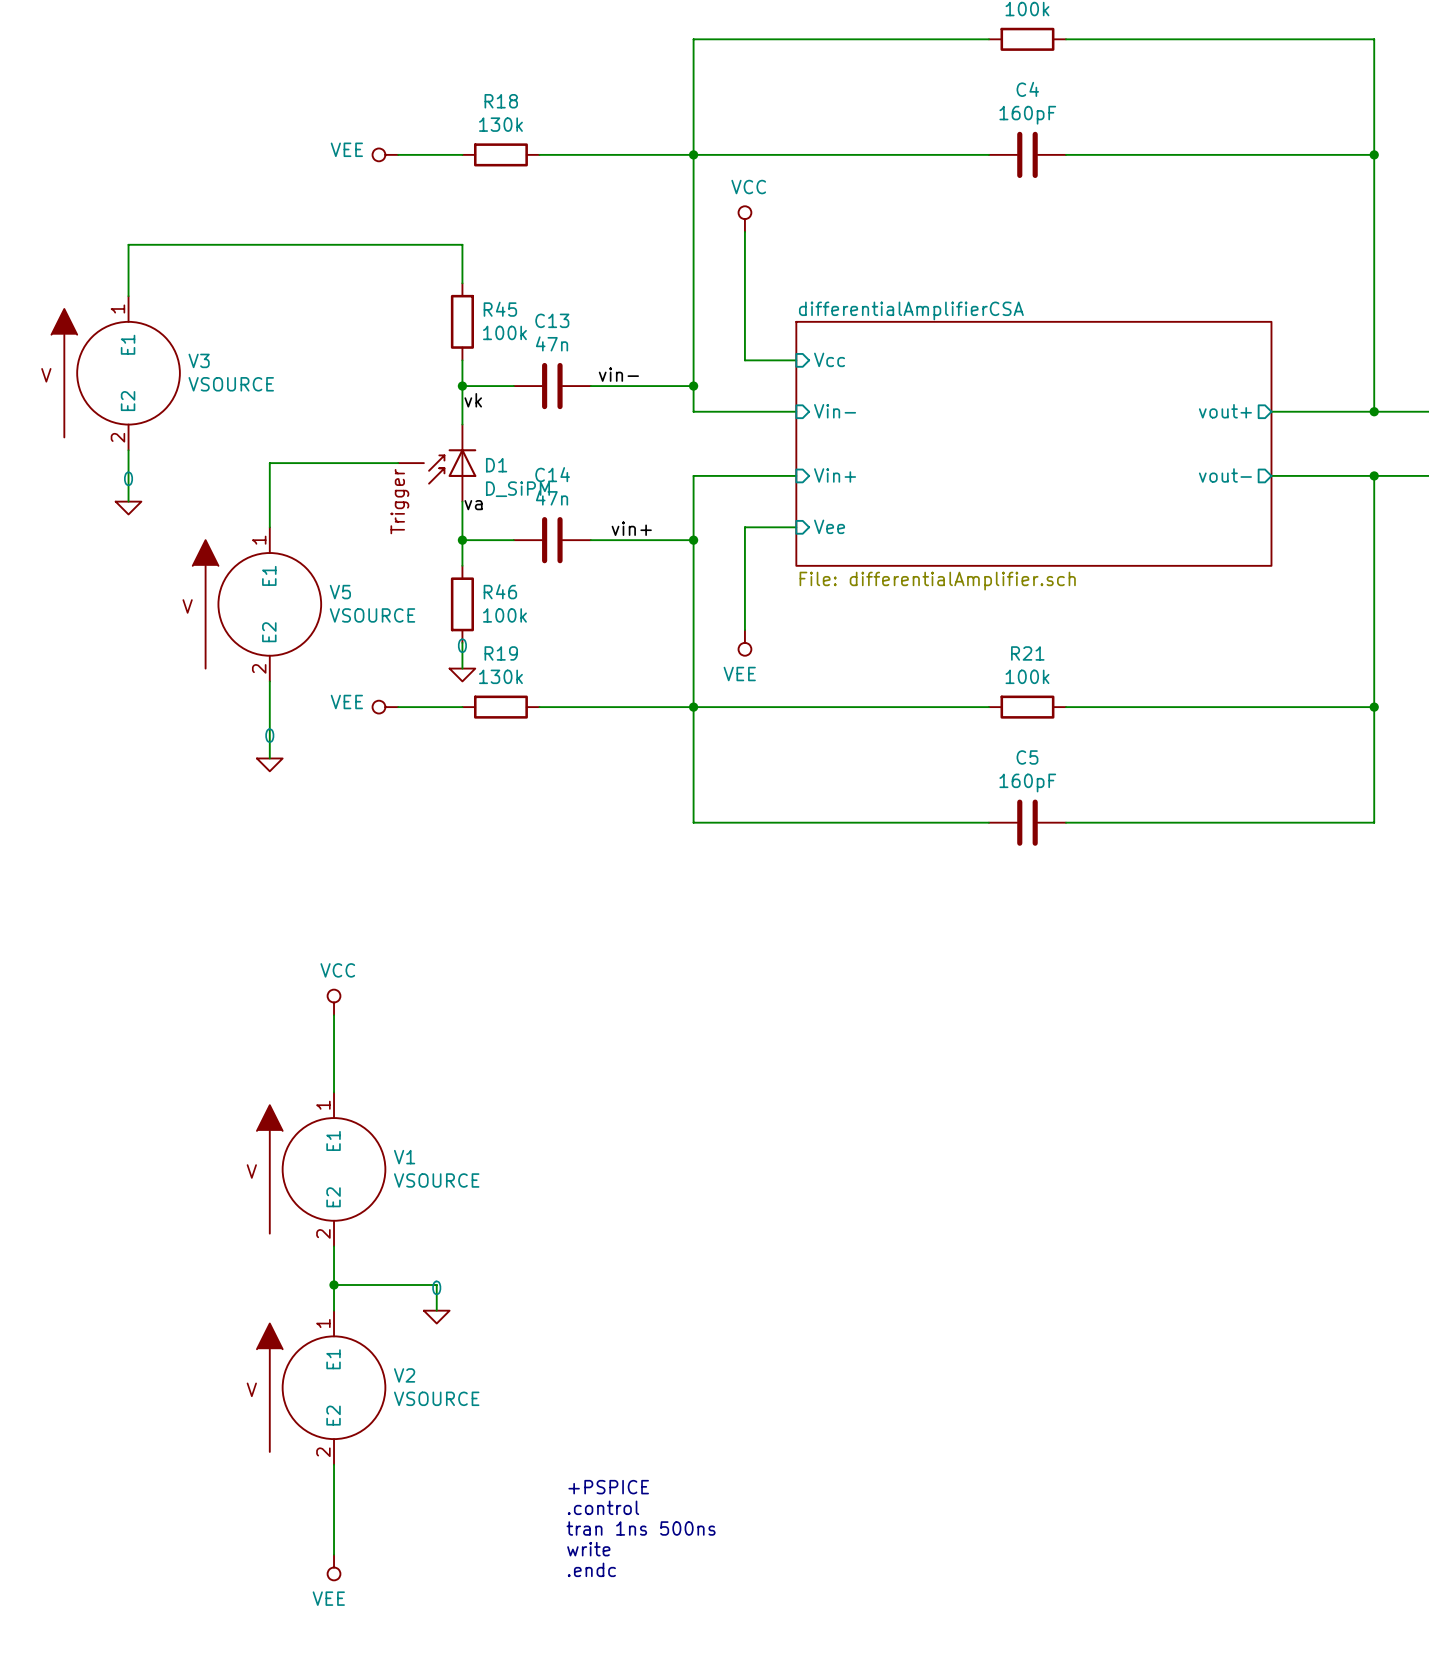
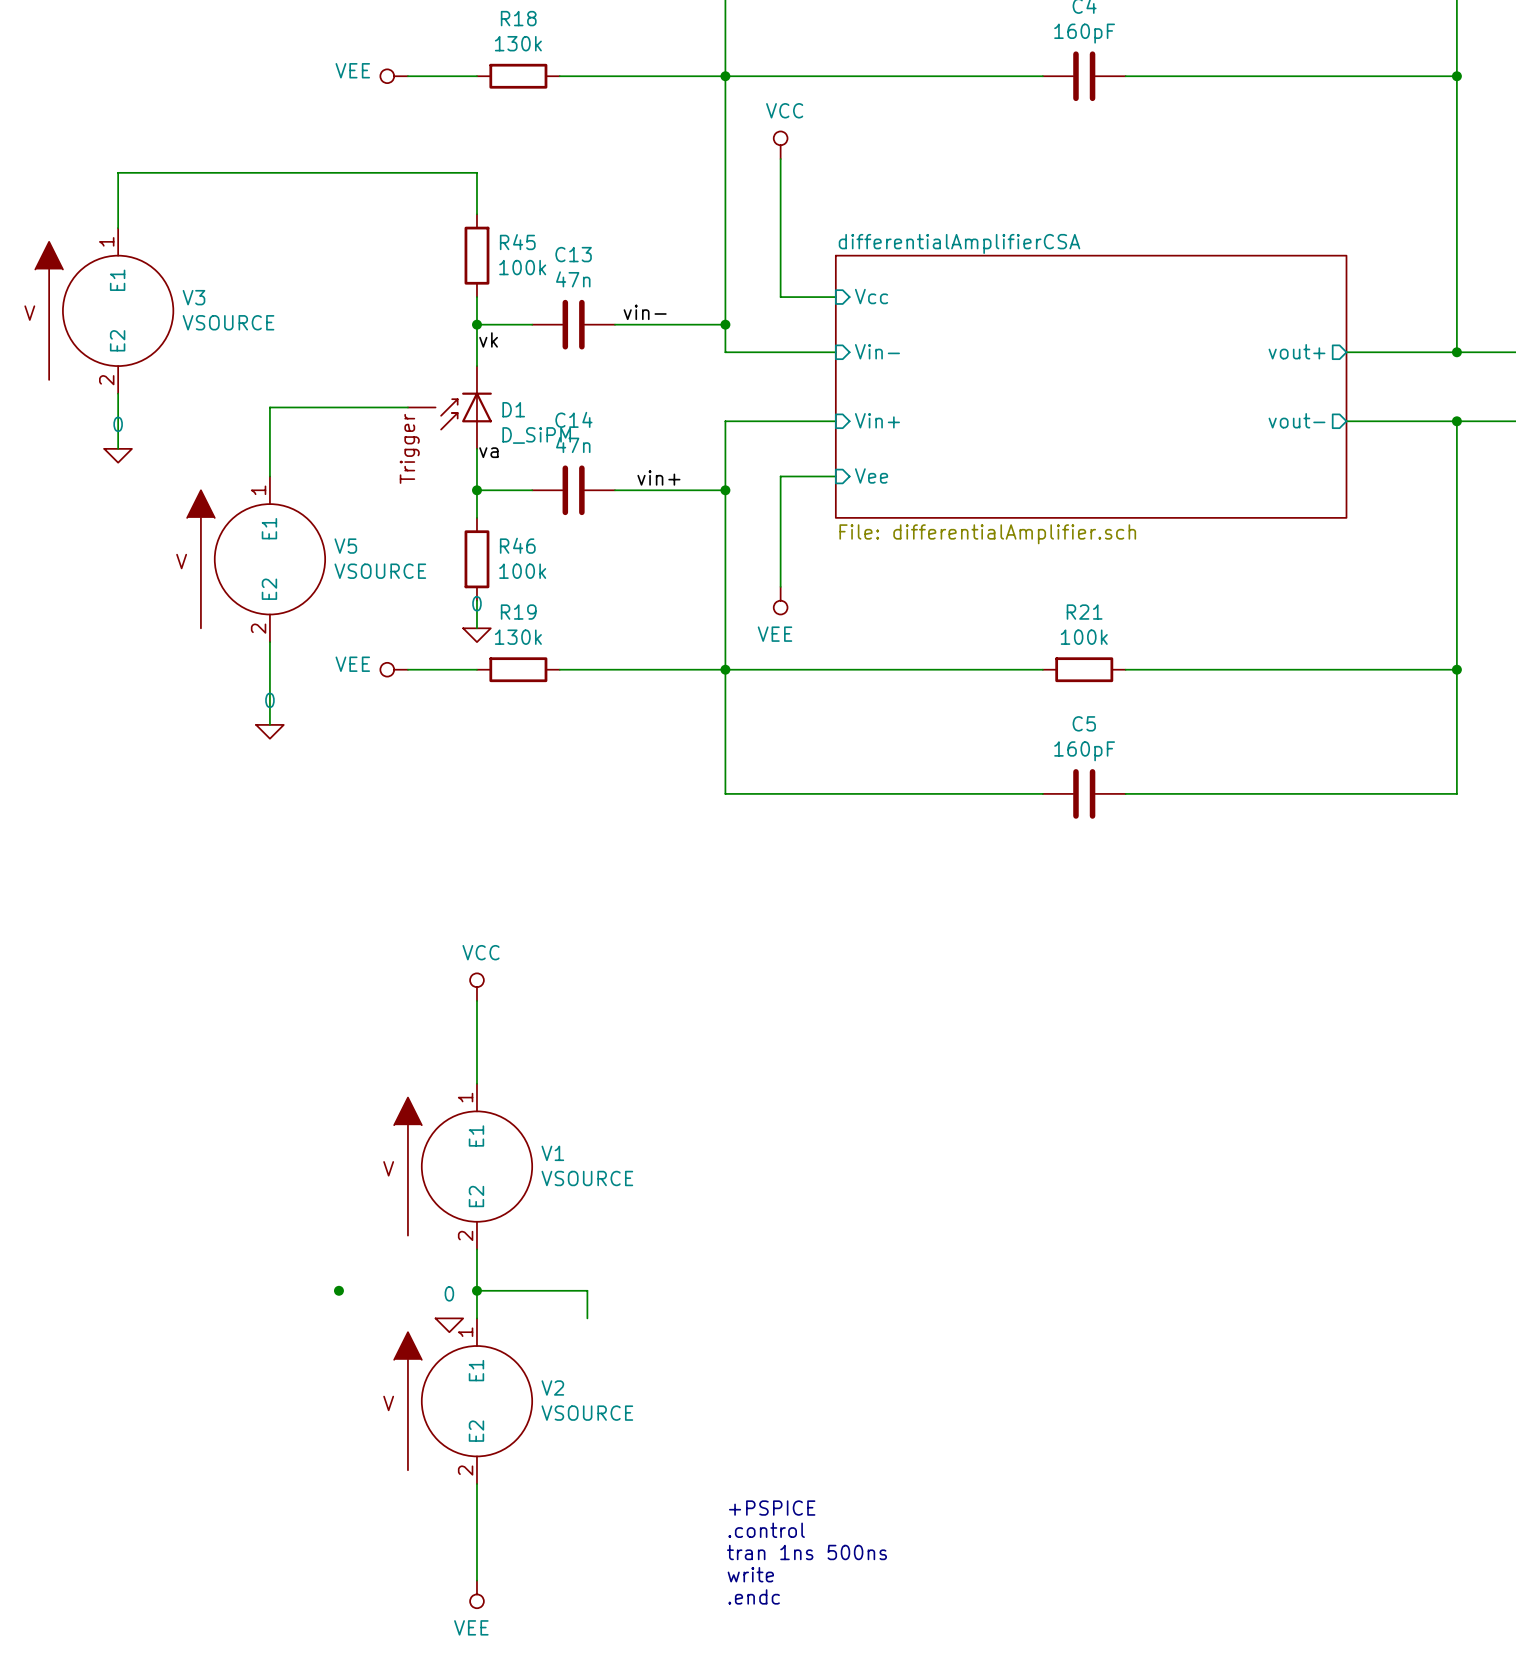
power symbol position: VCC (334, 1002) -> VCC (476, 987)
wire: (334, 1015) (334, 1092) -> (476, 1000) (476, 1083)
V1 position: (321, 1169) -> (463, 1166)
wire: (334, 1246) (334, 1310) -> (476, 1249) (476, 1318)
wire: (334, 1284) (436, 1284) (436, 1310) -> (476, 1290) (587, 1290) (587, 1318)
junction: none -> (476, 1290)
V2 position: (321, 1387) -> (463, 1401)
wire: (334, 1464) (334, 1554) -> (476, 1484) (476, 1580)
text position: +PSPICE (608, 1487) -> +PSPICE (772, 1508)
text position: .control (603, 1507) -> .control (766, 1530)
text position: tran 1ns 500ns (641, 1528) -> tran 1ns 500ns (807, 1552)
text position: write (588, 1549) -> write (750, 1574)
power symbol position: VEE (334, 1567) -> VEE (476, 1594)
text position: .endc (591, 1569) -> .endc (754, 1596)

